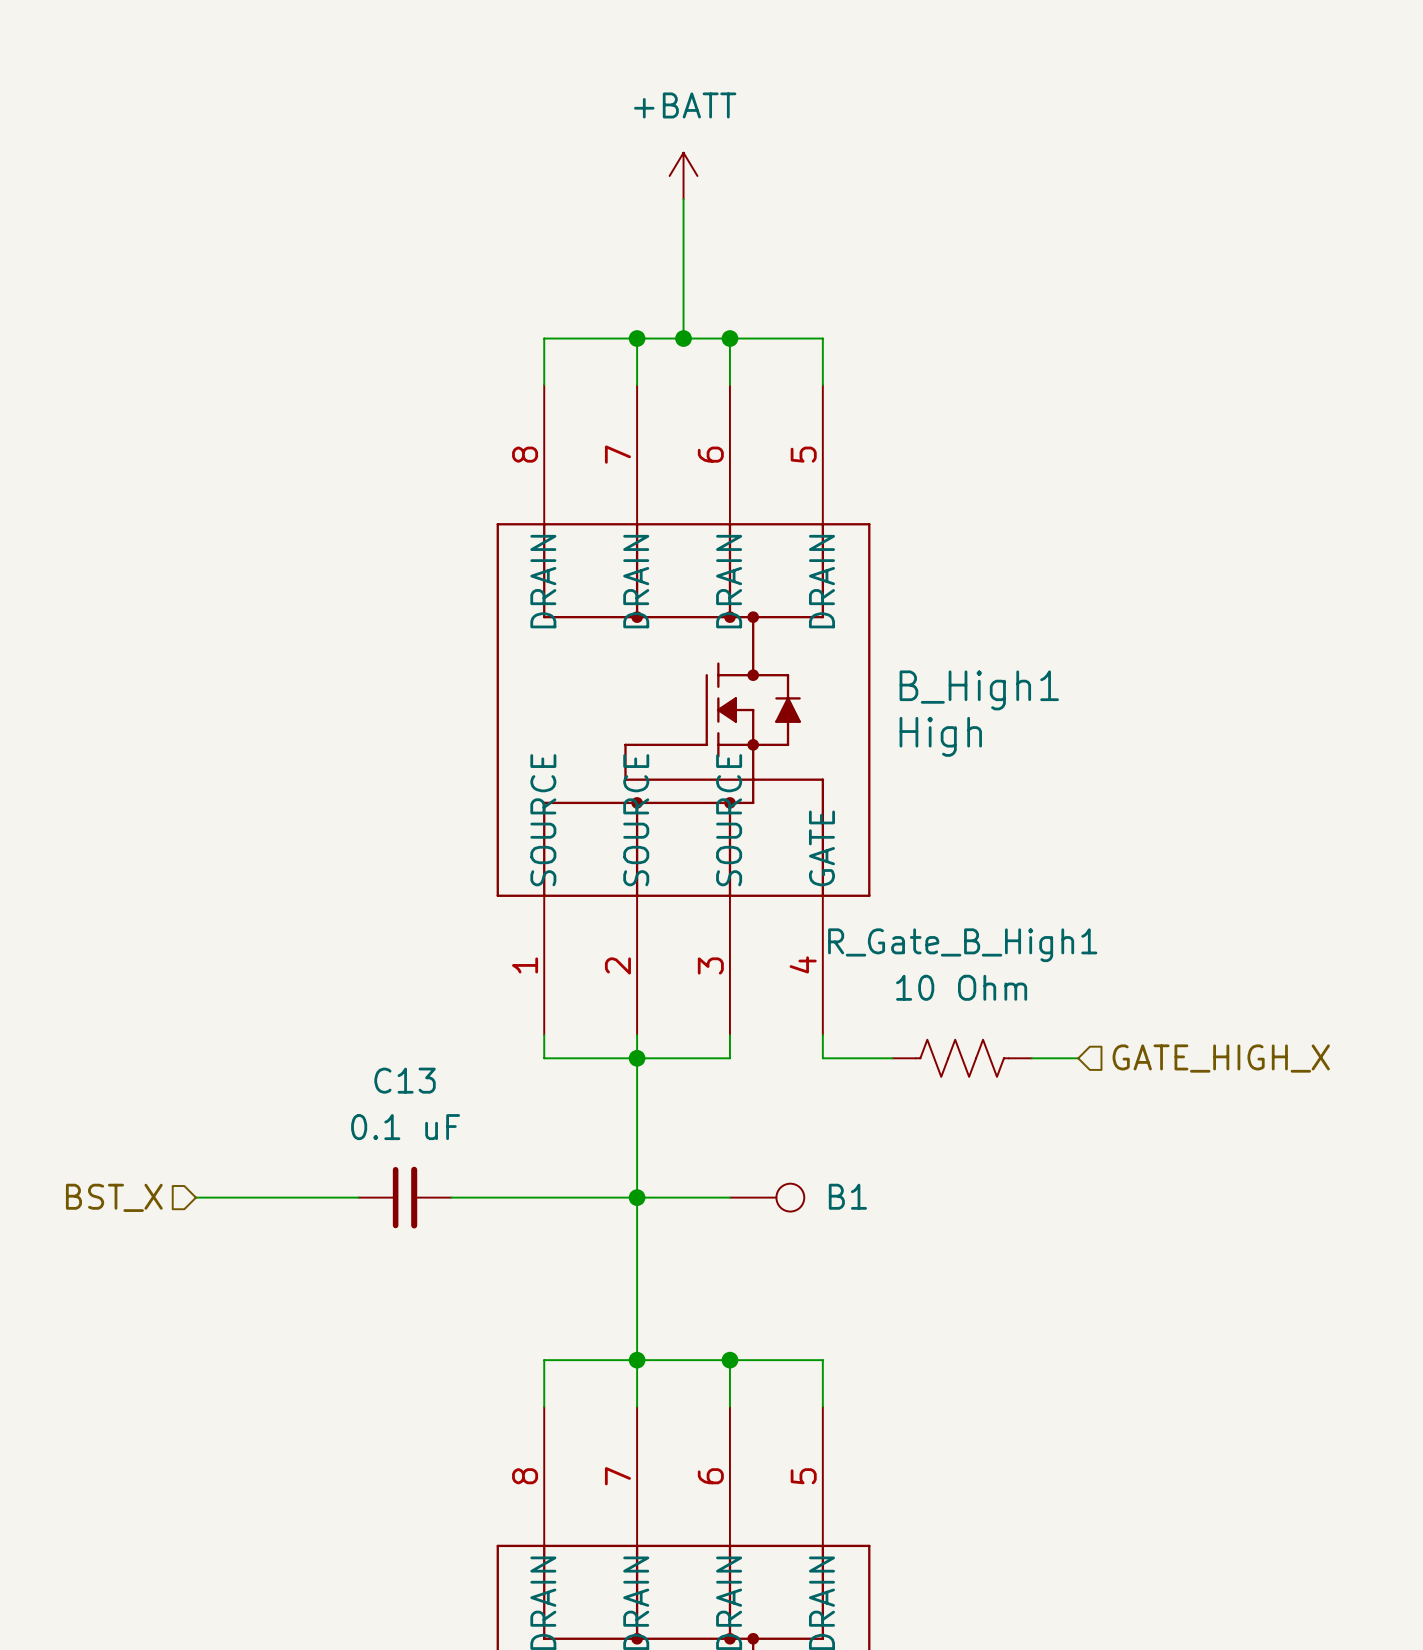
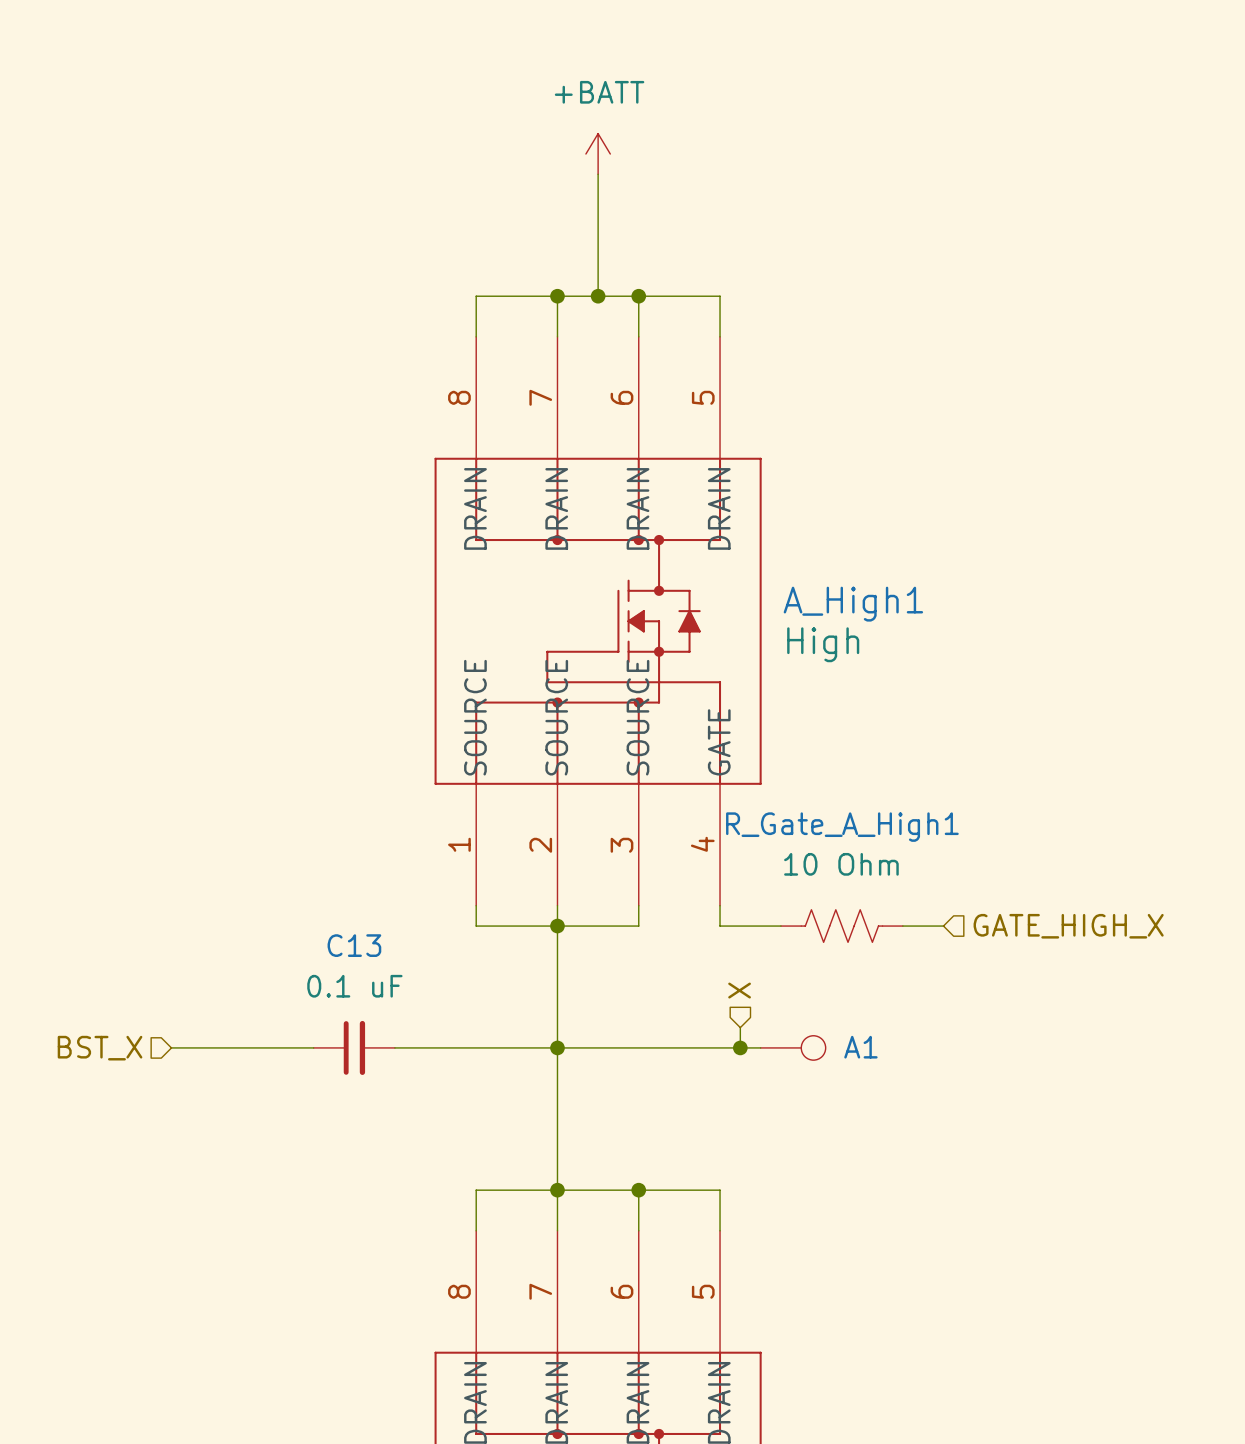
B_High1 name: B_High1 (979, 690) -> A_High1 (853, 604)
R_Gate_B_High1 name: R_Gate_B_High1 (962, 945) -> R_Gate_A_High1 (842, 827)
hierarchical label: none -> X (739, 990)
wire: none -> (740, 1027) (740, 1047)
wire: none -> (638, 1047) (760, 1047)
B1: (767, 1197) -> none
junction: none -> (740, 1047)
A1: none -> (793, 1047)

